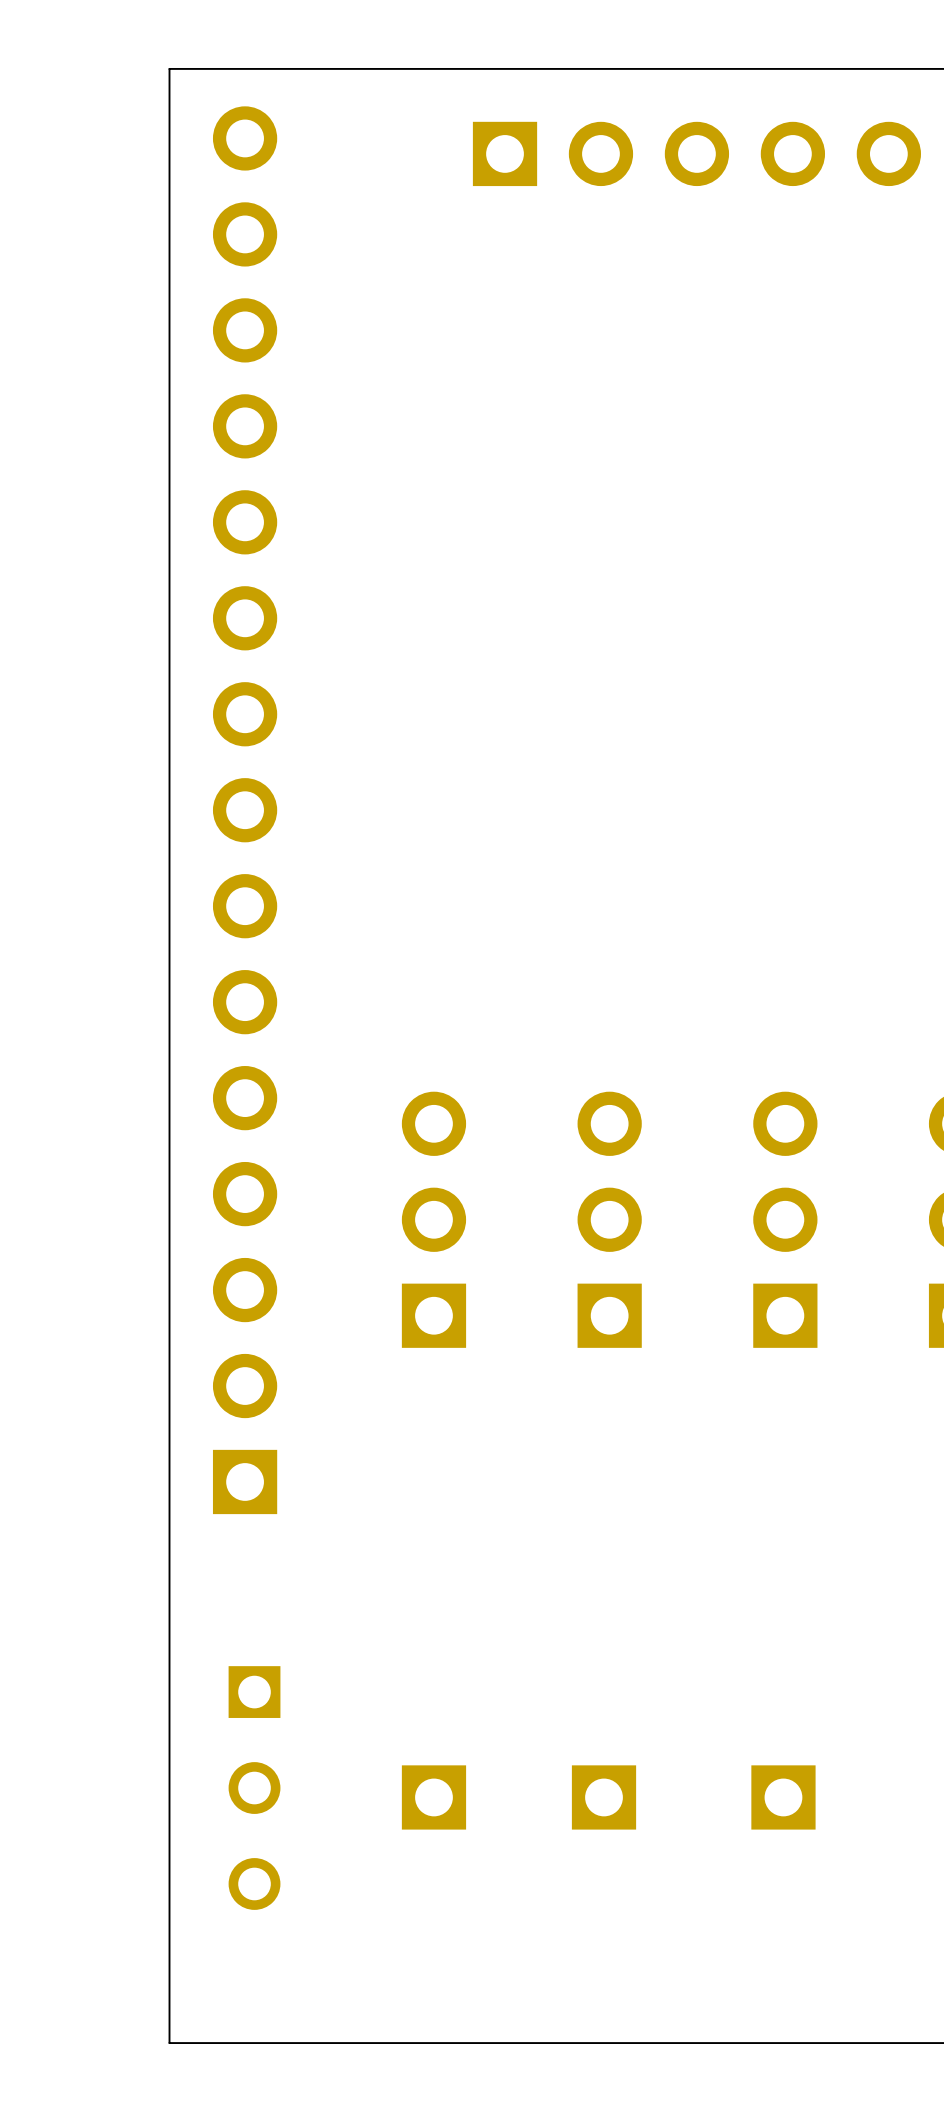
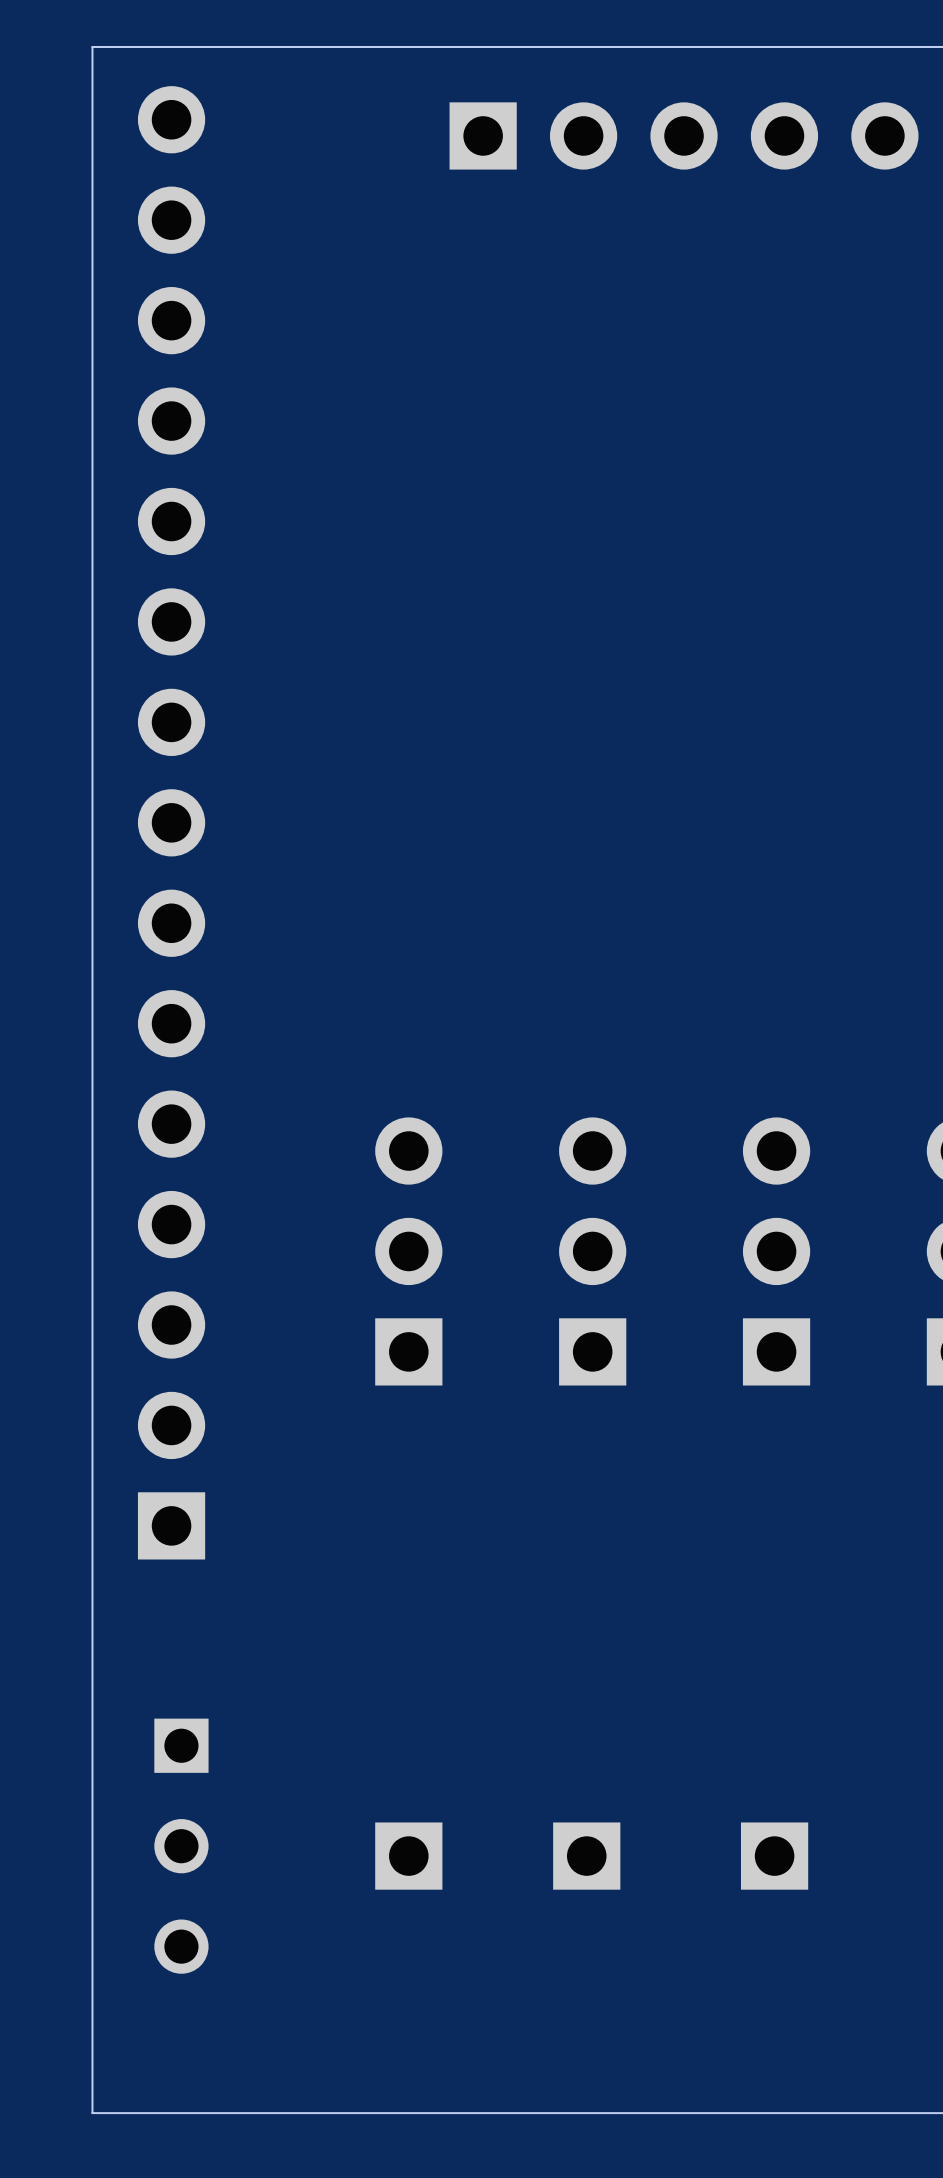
board edge: (169, 68) (169, 2043) -> (132, 46) (92, 46) (92, 2113) (132, 2113)
part position: (245, 810) -> (171, 822)
part position: (254, 1788) -> (181, 1846)

